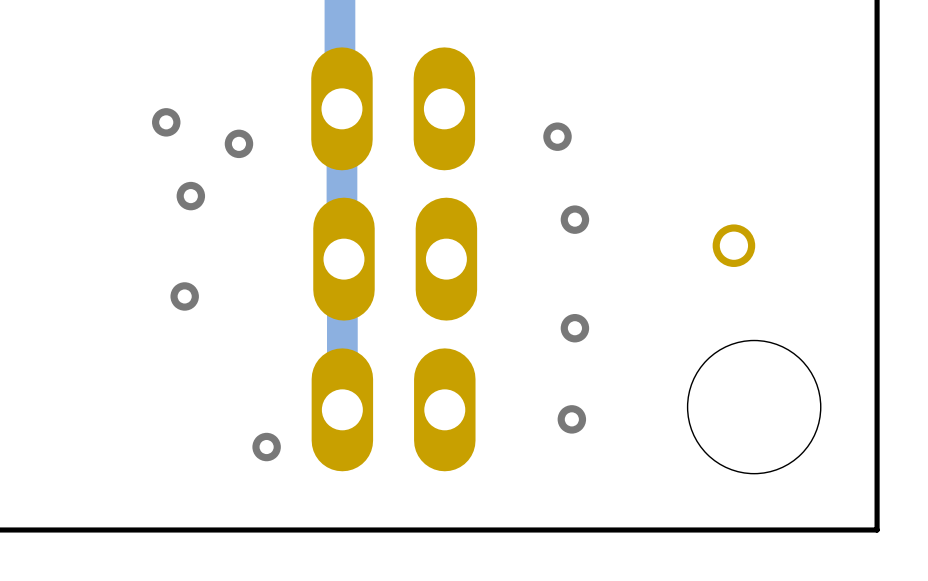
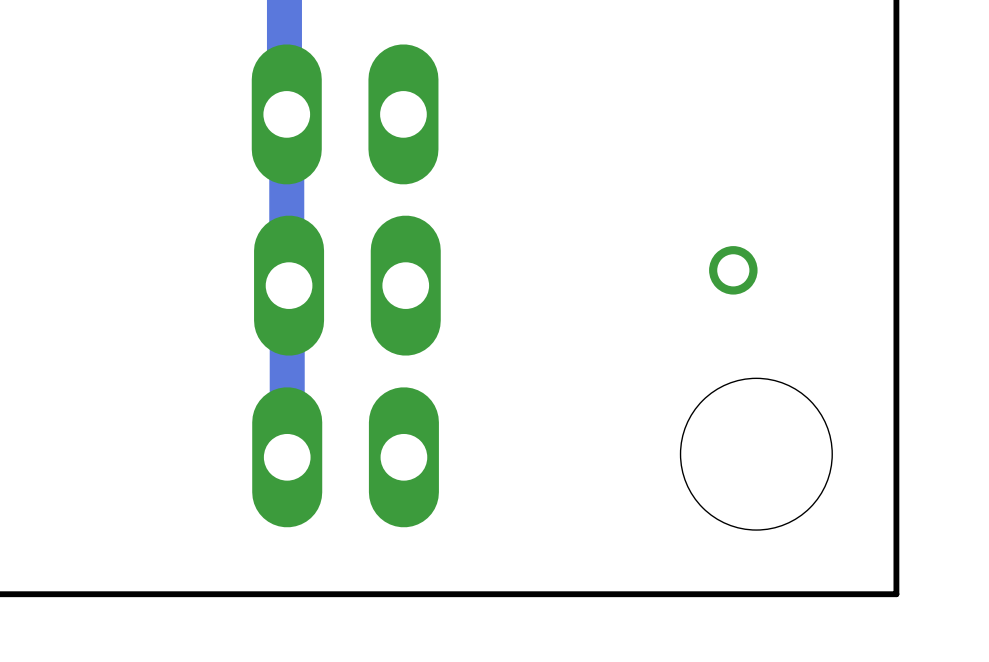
via: (166, 122) -> none
via: (557, 136) -> none
via: (238, 143) -> none
via: (190, 196) -> none
via: (574, 219) -> none
via: (184, 296) -> none
via: (574, 328) -> none
via: (571, 419) -> none
via: (266, 447) -> none

